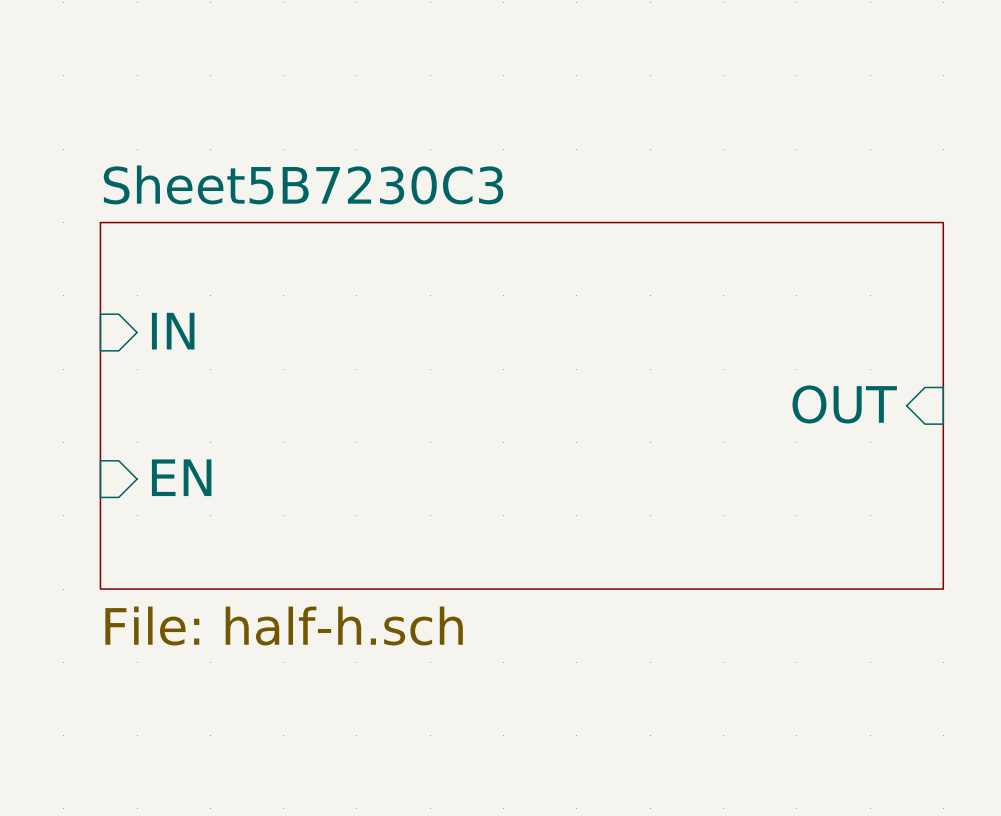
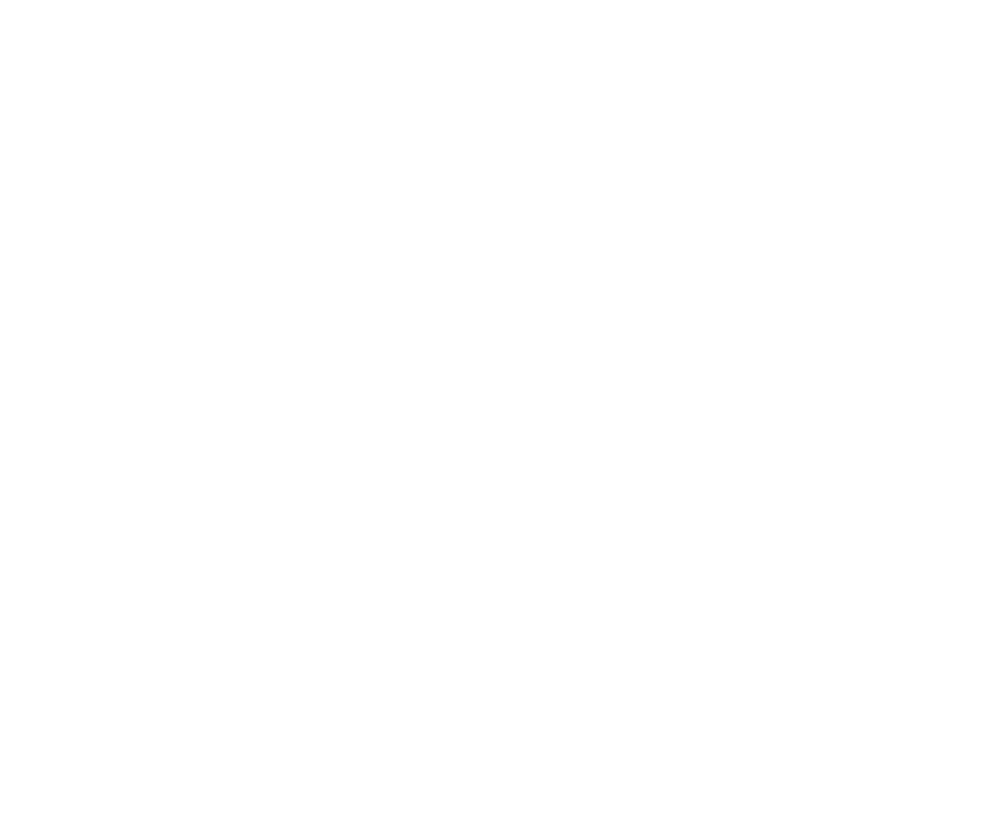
sheet pin: IN (173, 331) -> none
sheet pin: OUT (844, 404) -> none
sheet Sheet5B7230C3: File: half-h.sch (521, 405) -> none
sheet pin: EN (181, 477) -> none

